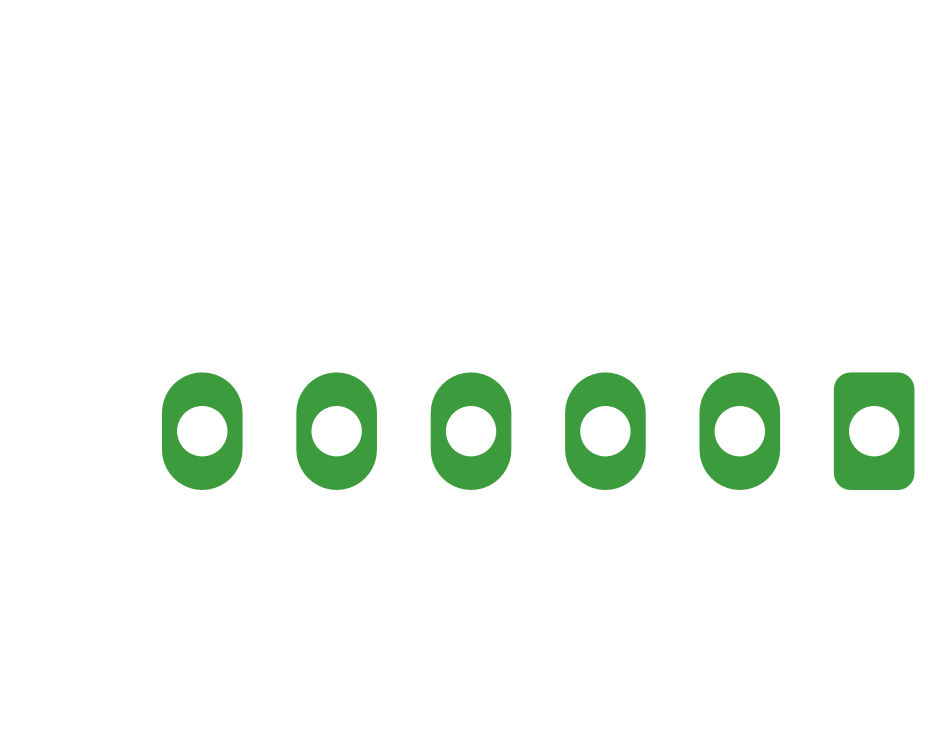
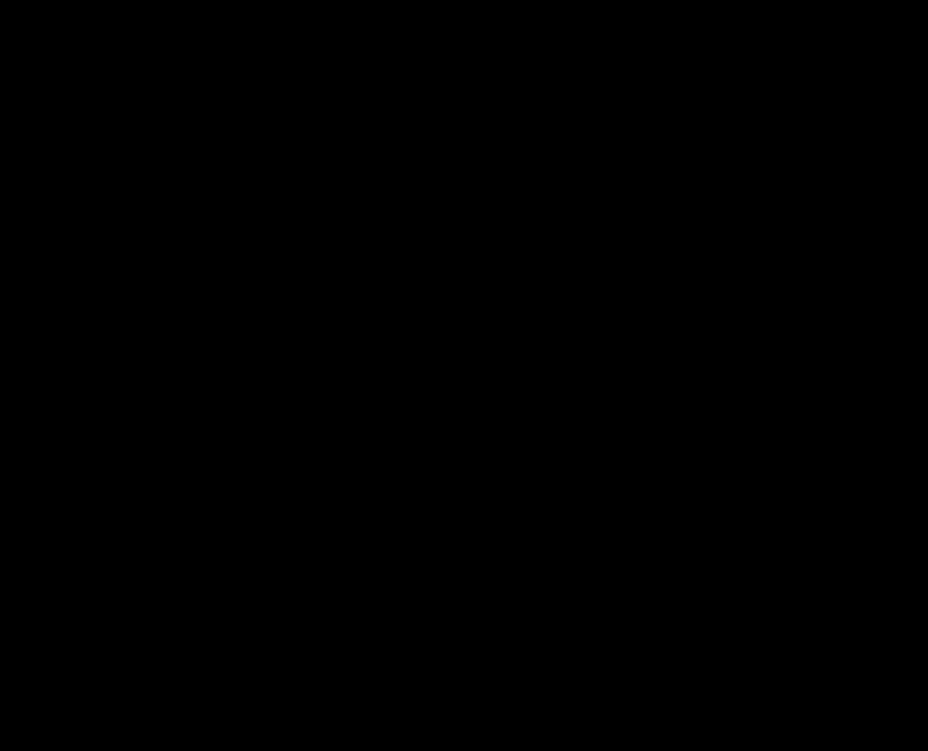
part: (538, 431) -> none

